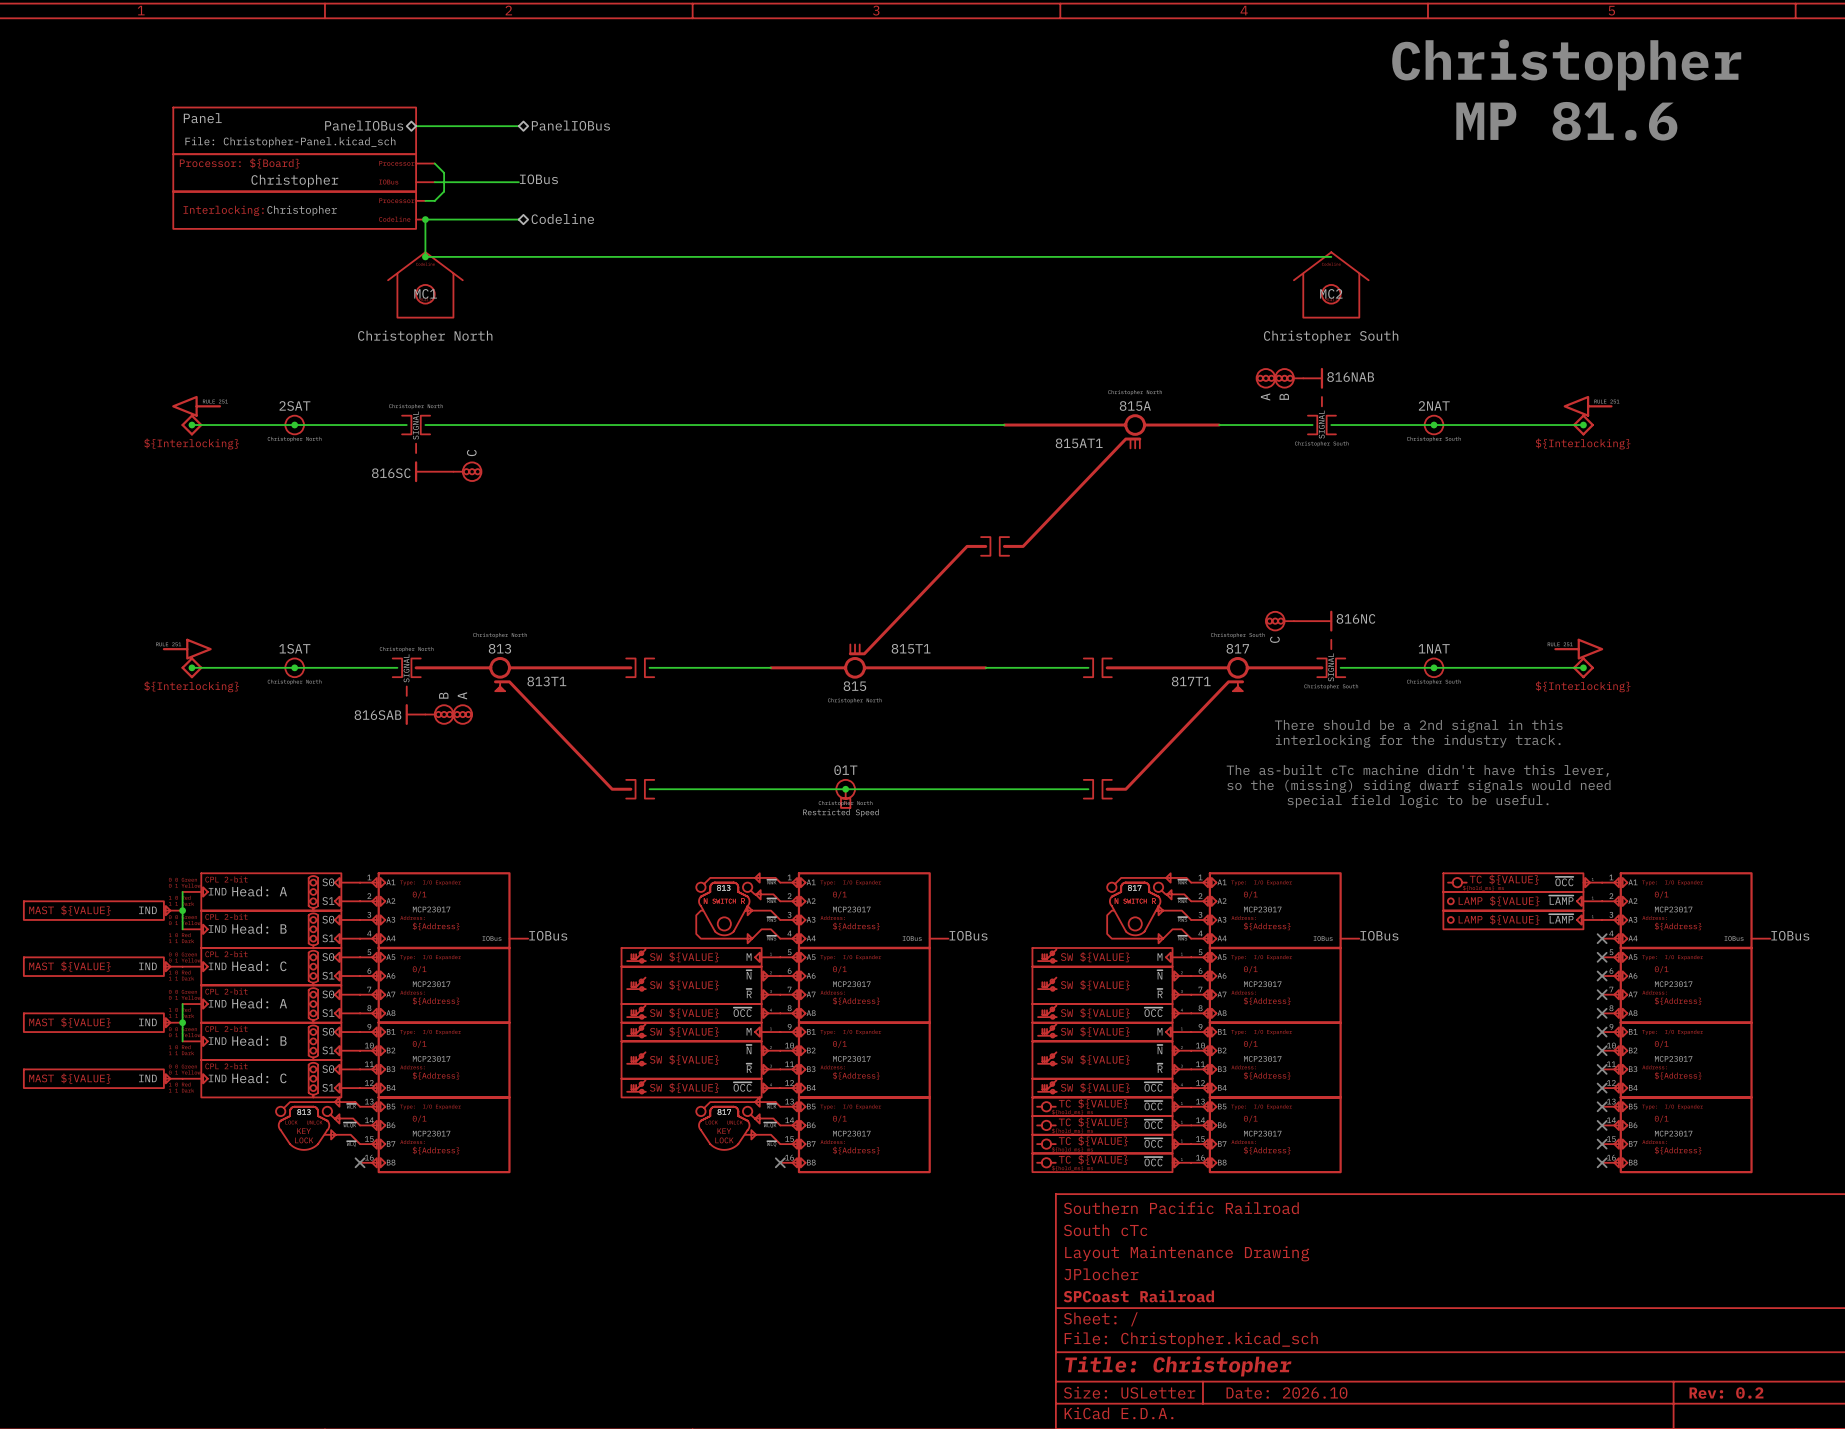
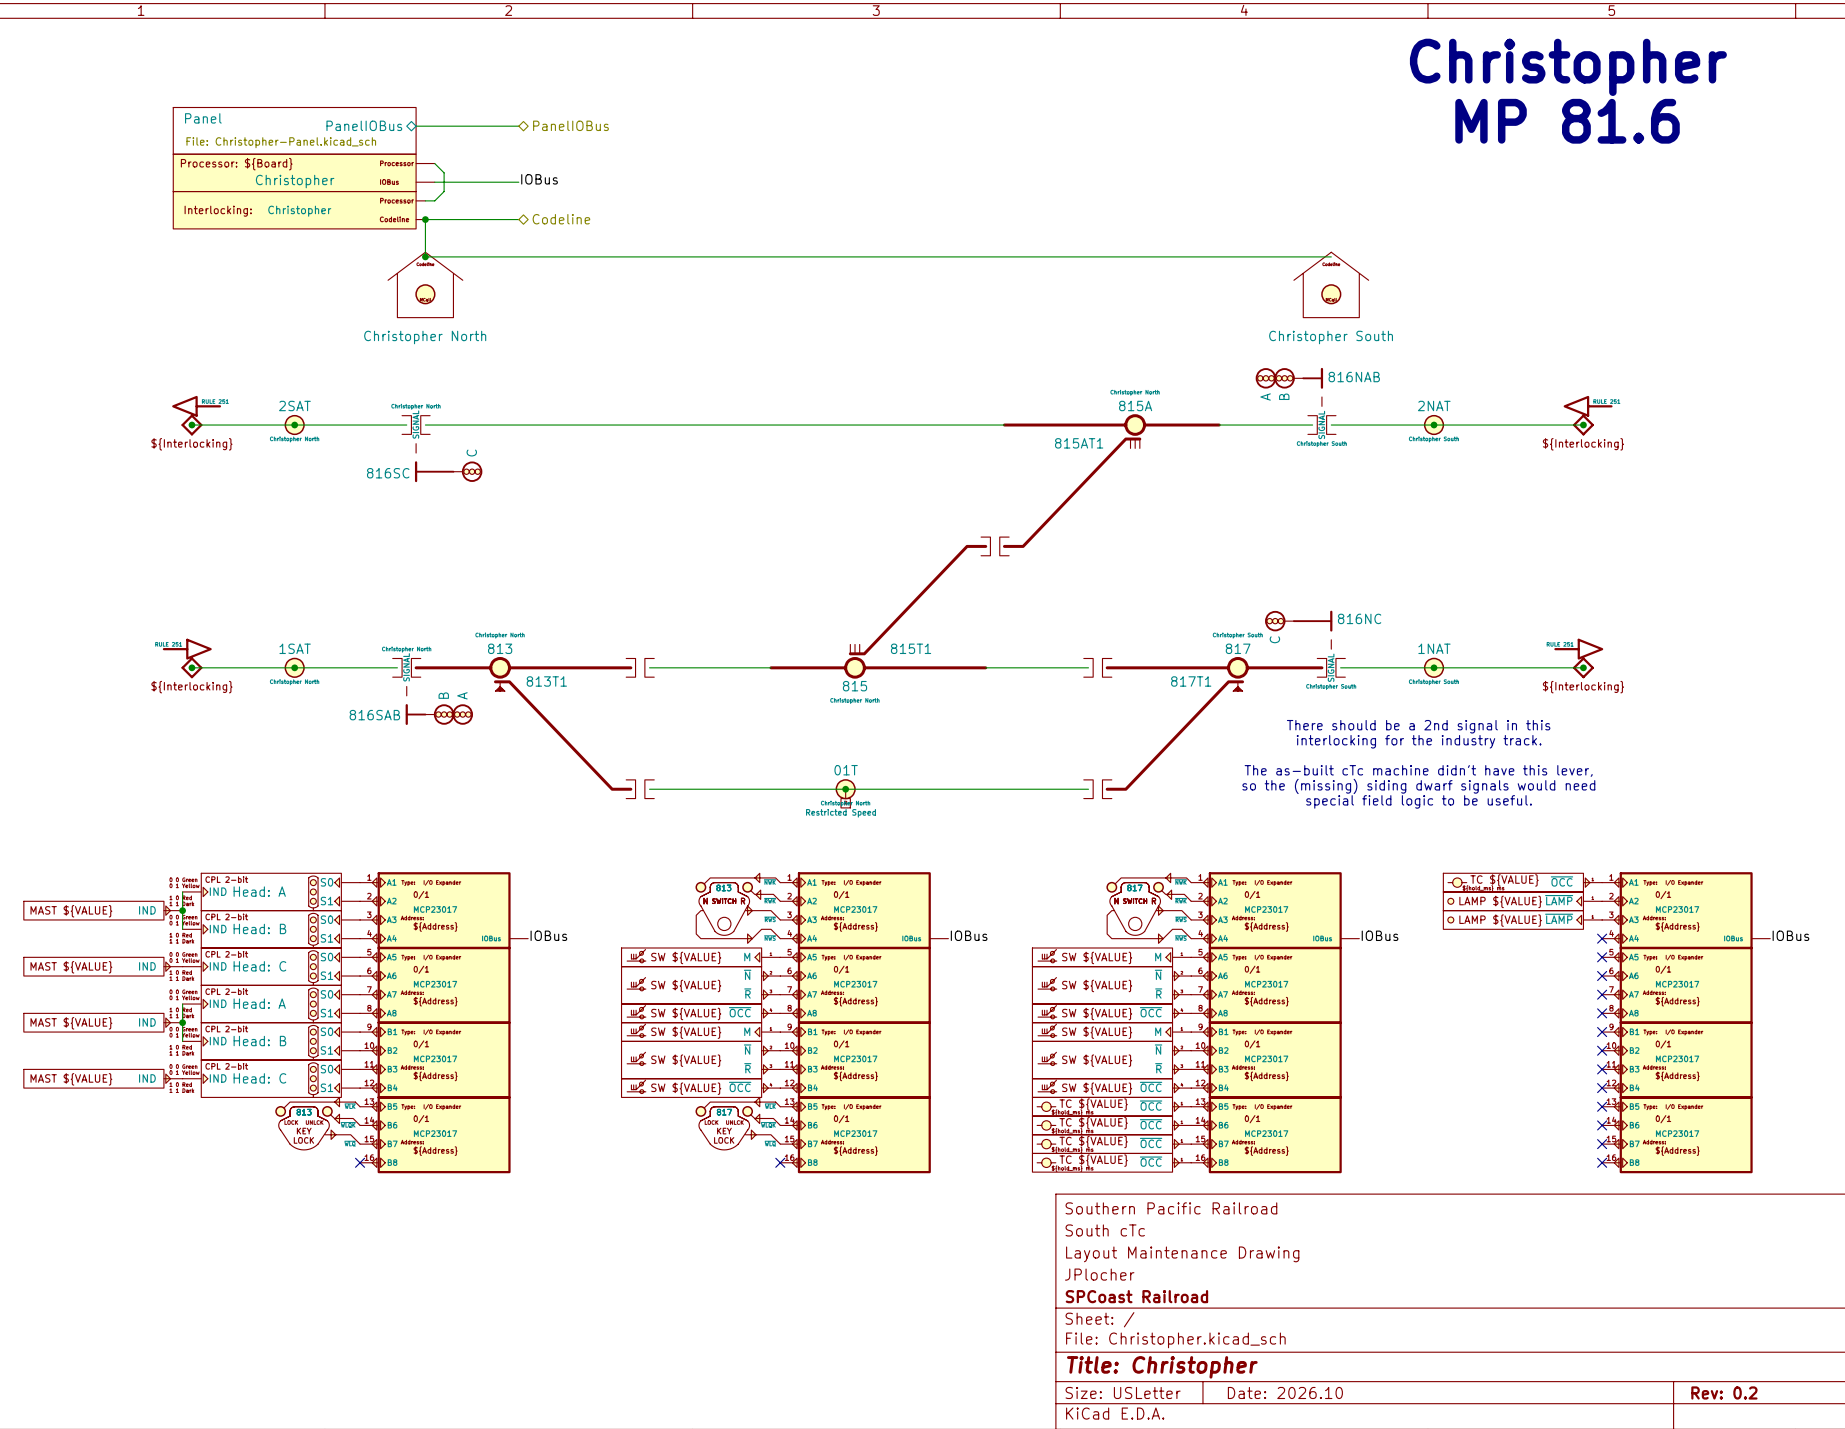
part value: MC1 (425, 293) -> none
part value: MC2 (1331, 293) -> none

